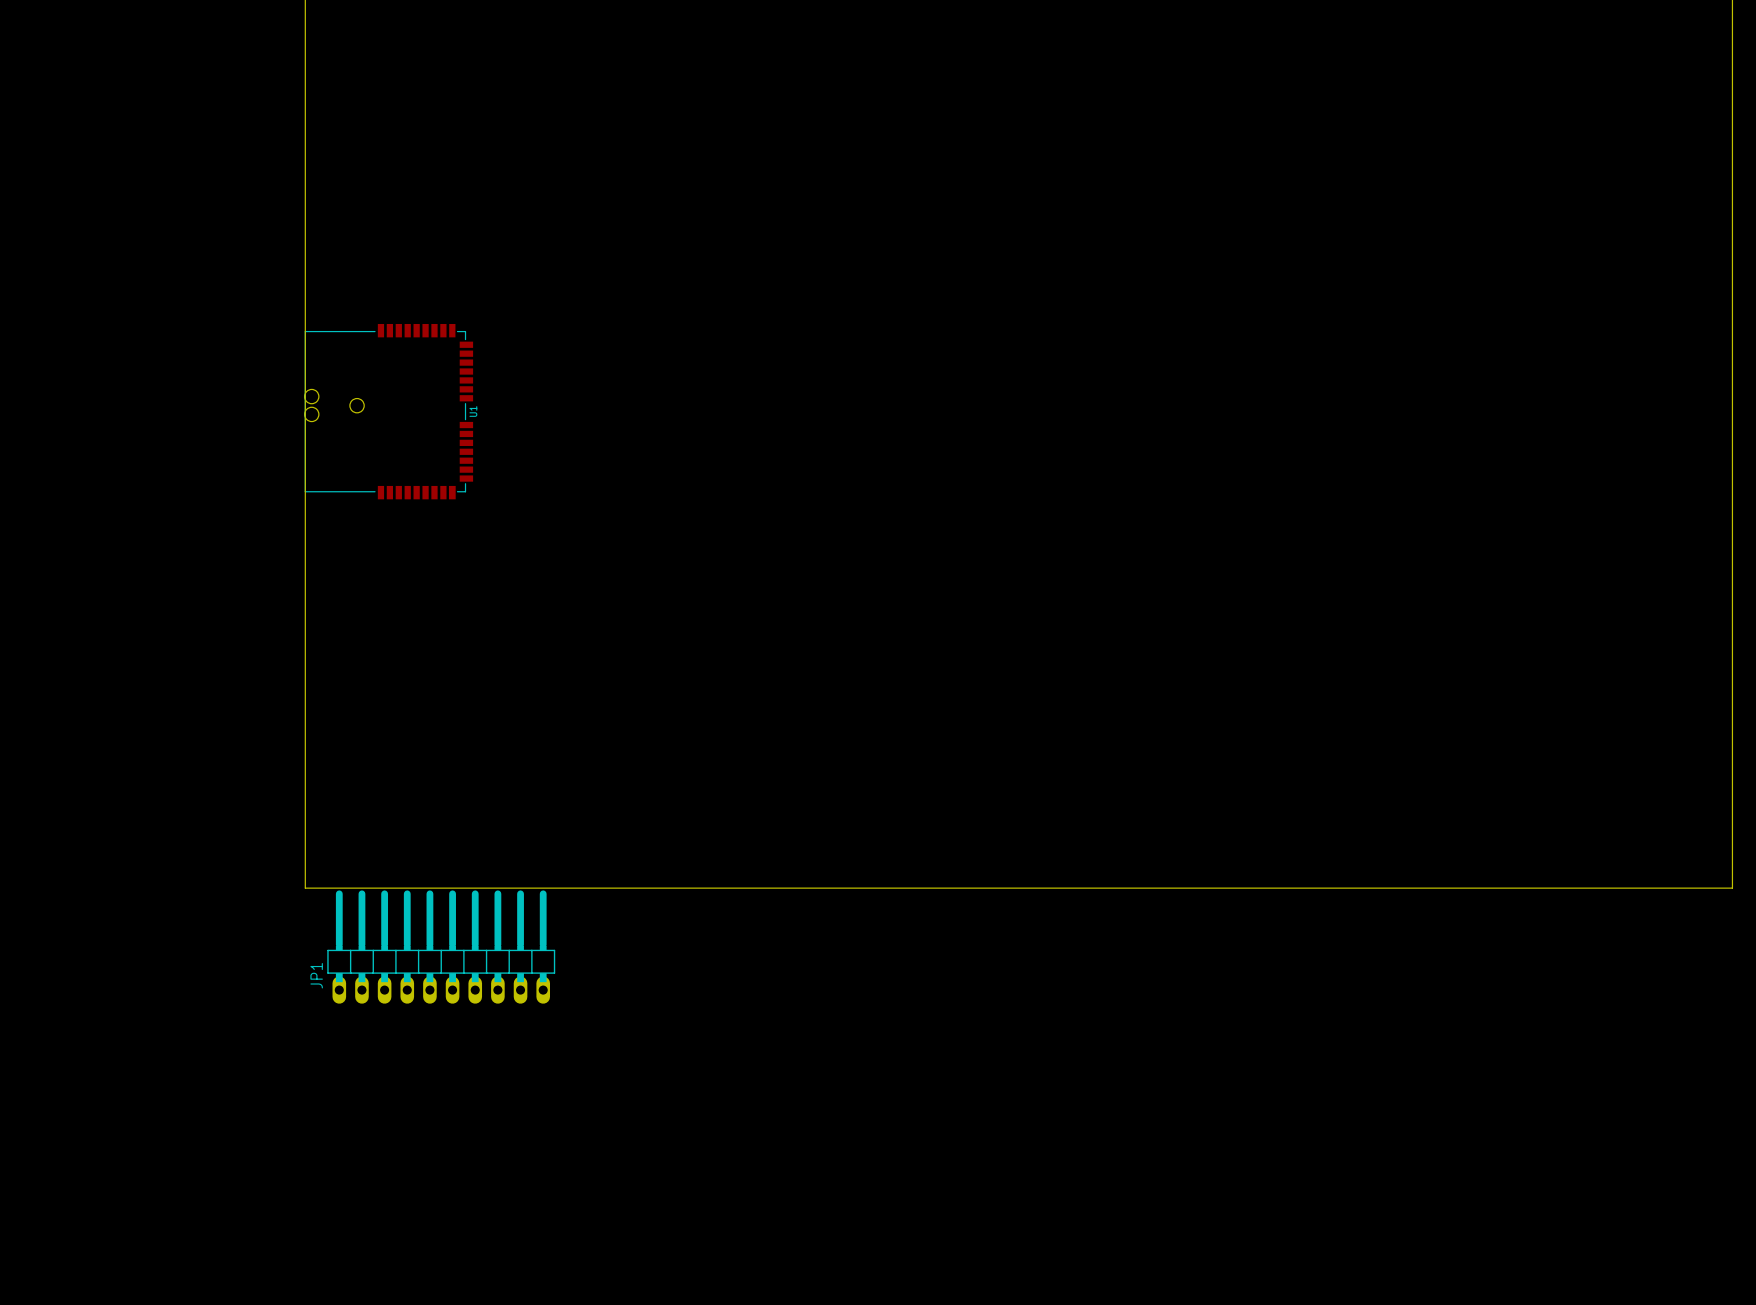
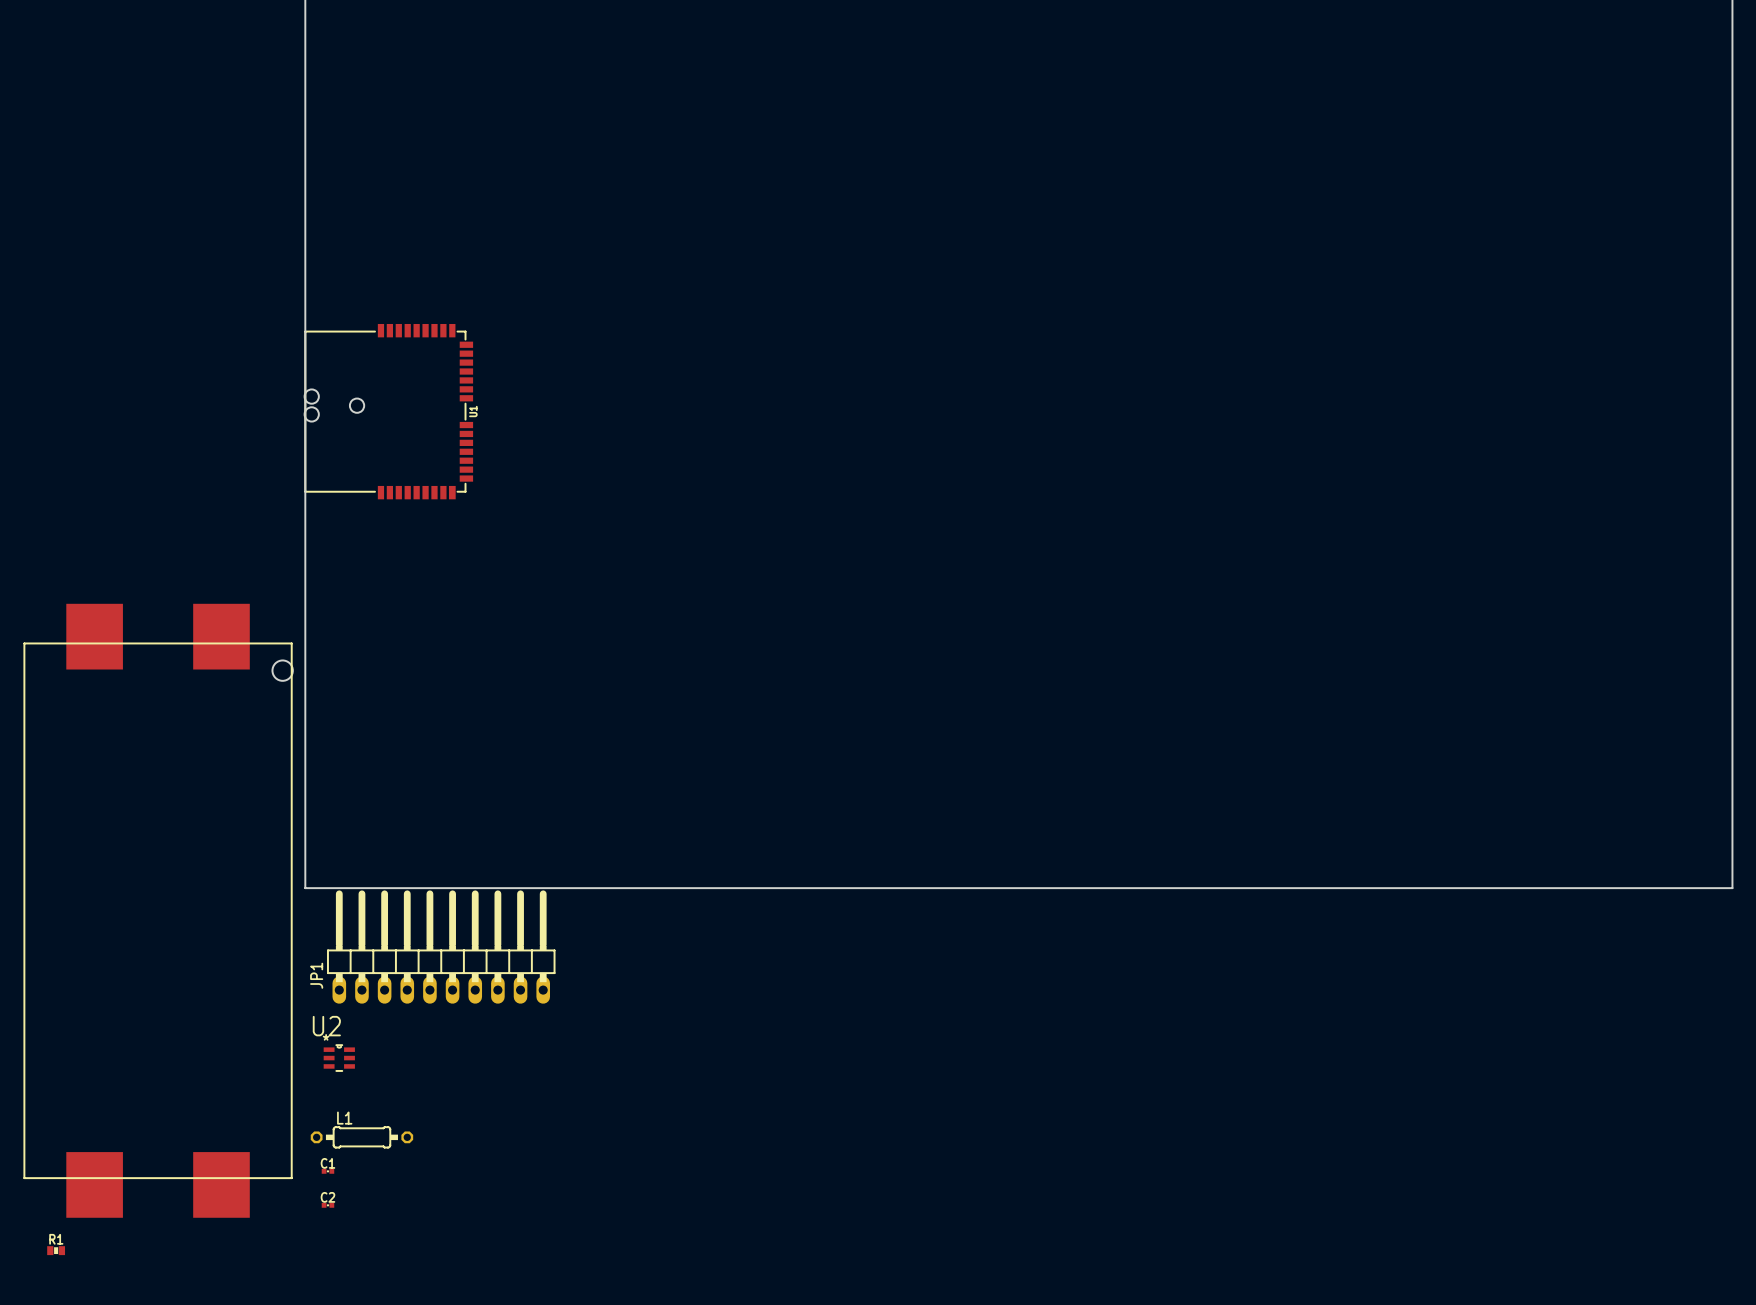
part: none -> (158, 910)
U2: none -> (339, 1058)
L1: none -> (361, 1137)
C1: none -> (327, 1171)
C2: none -> (327, 1205)
R1: none -> (56, 1250)

